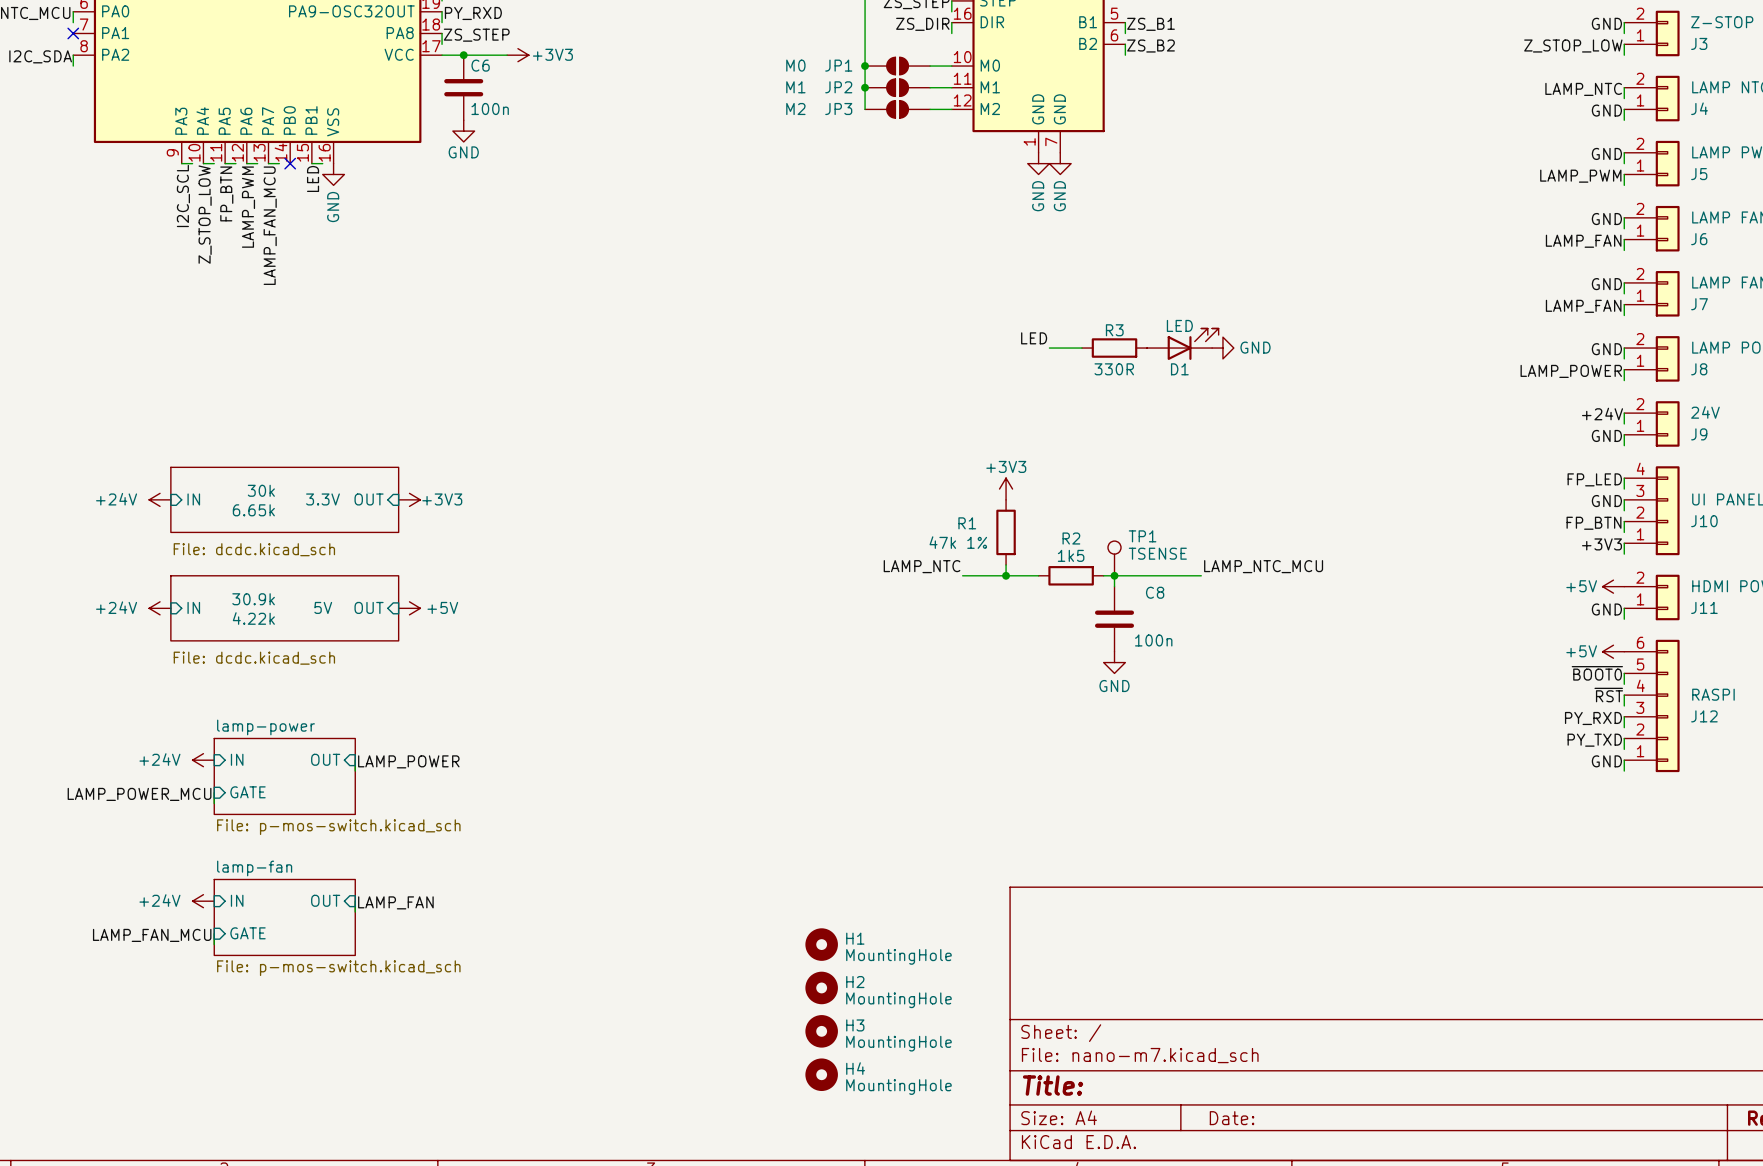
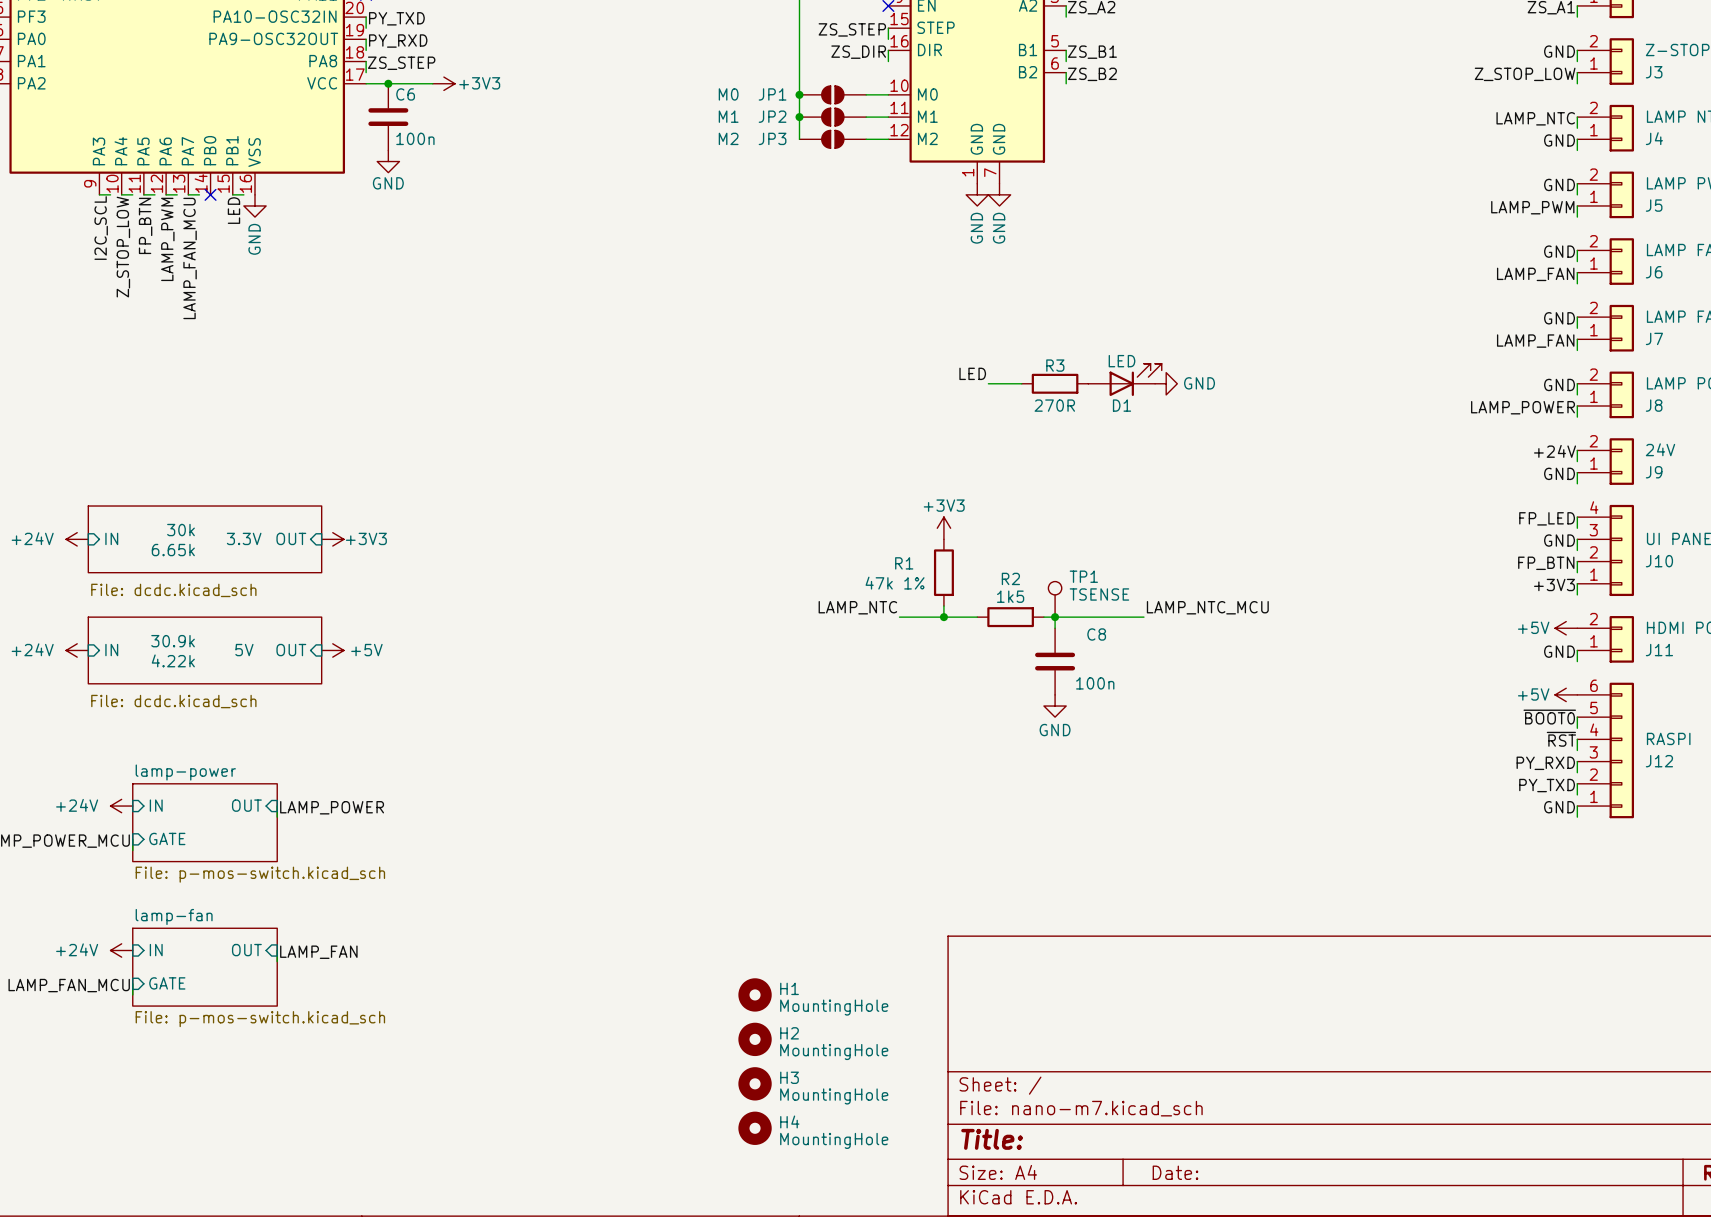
R3 value: 330R (1114, 369) -> 270R (1054, 405)

